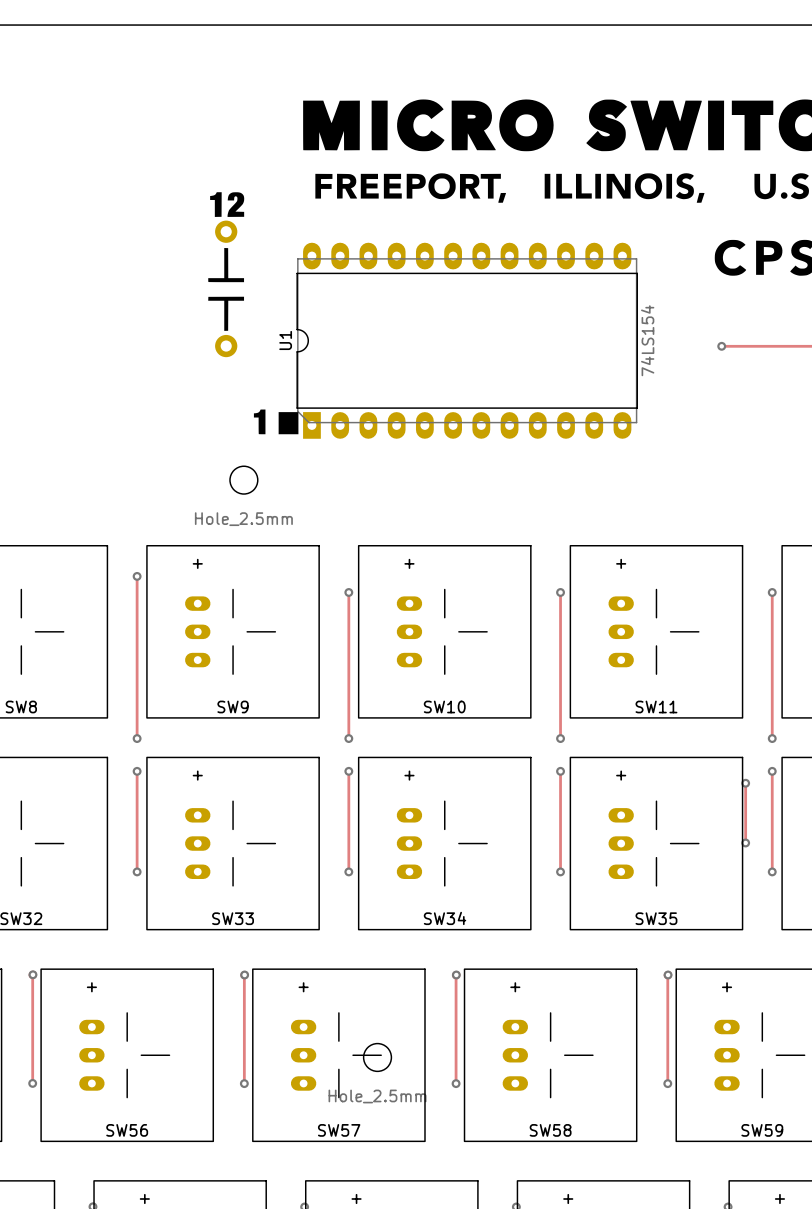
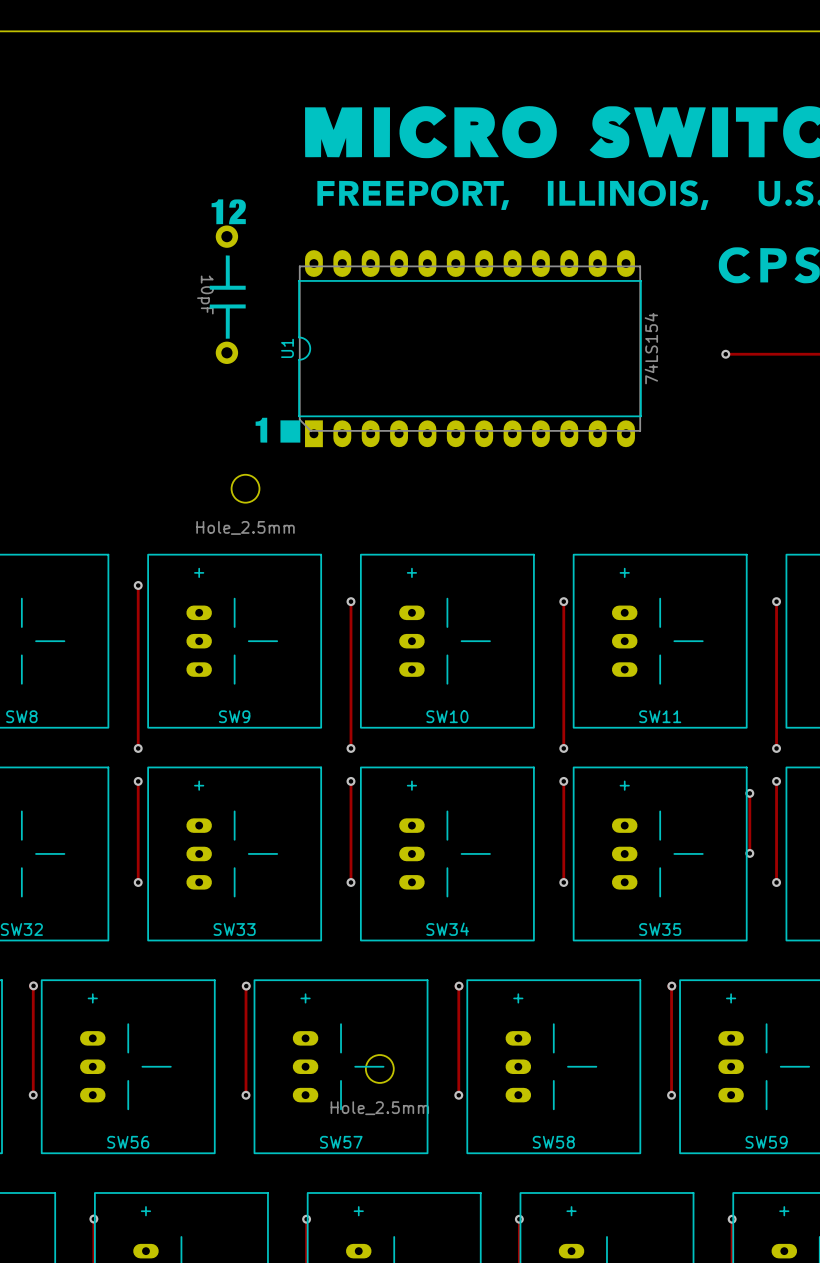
part: (226, 231) -> none
part: none -> 10pF (226, 294)
part: (226, 346) -> none

